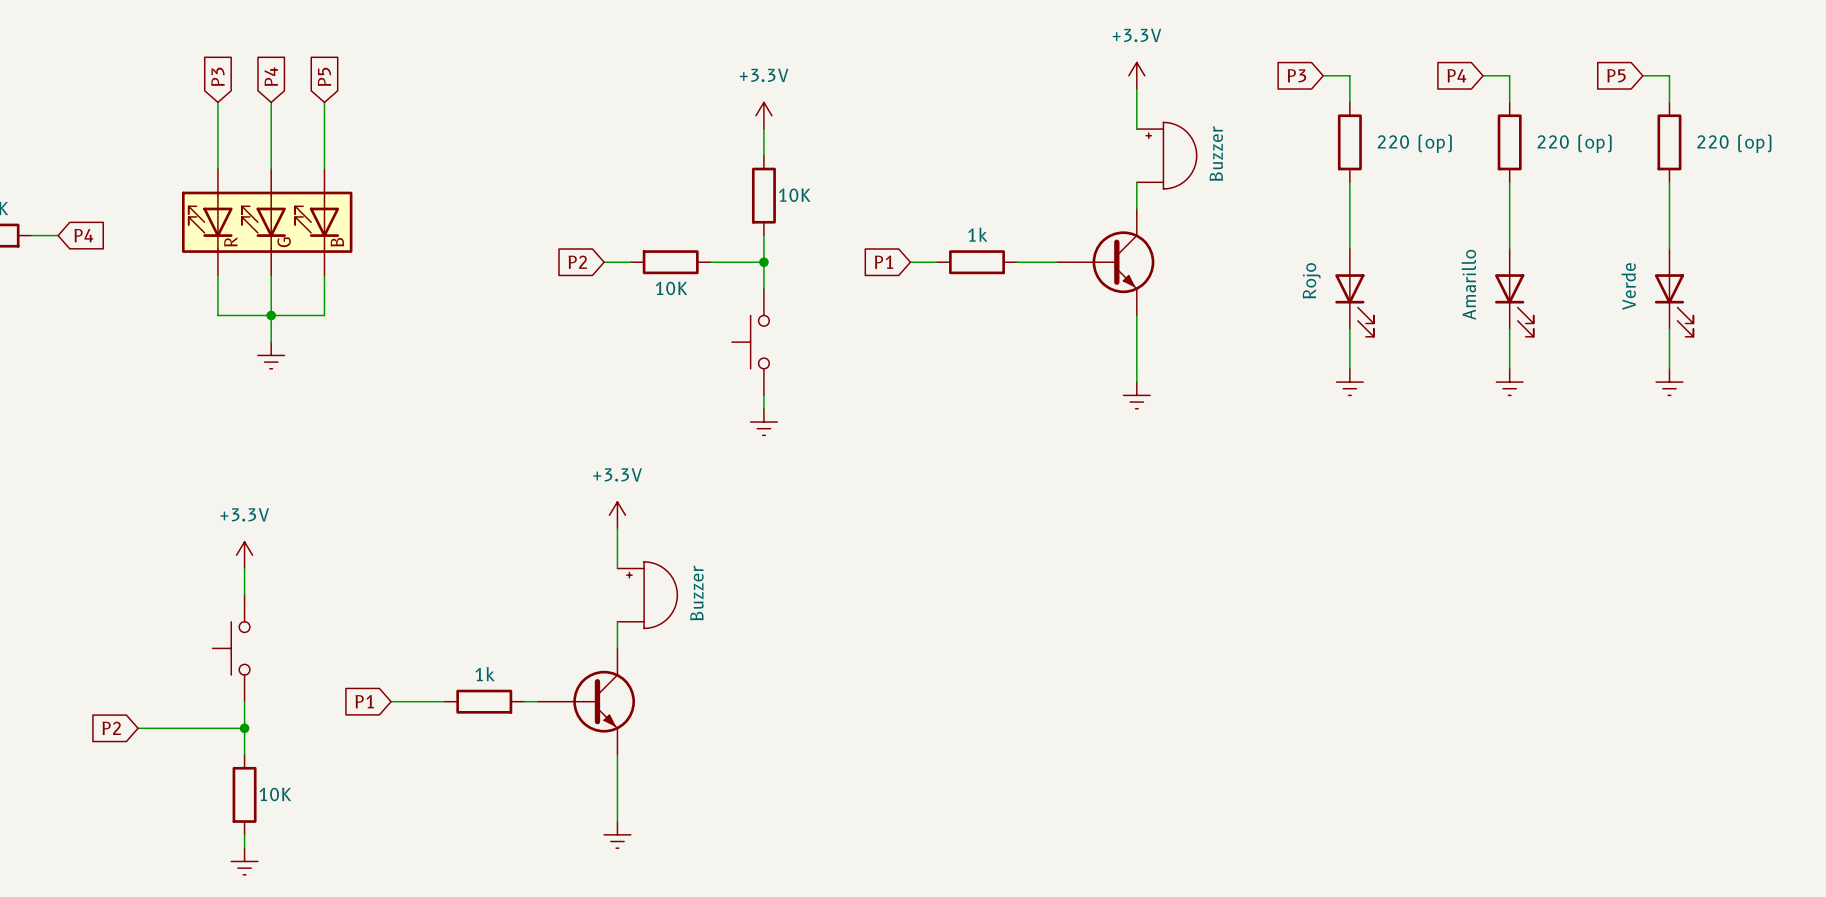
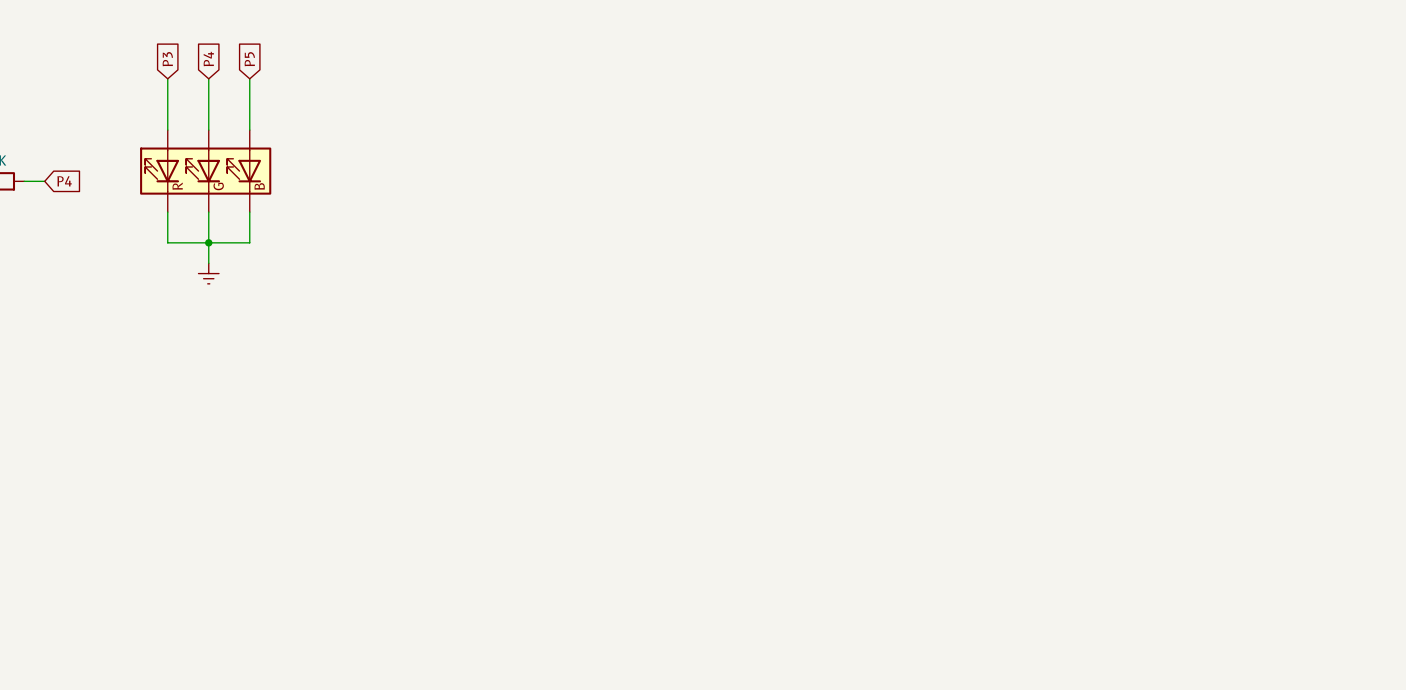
power symbol: +3.3V (1136, 75) -> none
global label: P3 (1296, 75) -> none
wire: (1323, 75) (1349, 75) (1349, 102) -> none
global label: P4 (1456, 75) -> none
wire: (1483, 75) (1509, 75) (1509, 102) -> none
global label: P5 (1616, 75) -> none
wire: (1642, 75) (1669, 75) (1669, 102) -> none
wire: (1136, 89) (1136, 129) -> none
power symbol: +3.3V (763, 115) -> none
wire: (763, 129) (763, 155) -> none
part: 220 (op) (1349, 142) -> none
part: 220 (op) (1509, 142) -> none
part: 220 (op) (1669, 142) -> none
part: Buzzer (1166, 155) -> none
wire: (1136, 182) (1136, 208) -> none
wire: (1349, 182) (1349, 248) -> none
wire: (1509, 182) (1509, 248) -> none
wire: (1669, 182) (1669, 248) -> none
part: 10K (763, 195) -> none
wire: (763, 235) (763, 288) -> none
global label: P2 (577, 262) -> none
wire: (604, 262) (630, 262) -> none
part: 10K (670, 262) -> none
wire: (710, 262) (763, 262) -> none
junction: (763, 262) -> none
global label: P1 (884, 262) -> none
wire: (910, 262) (937, 262) -> none
part: 1k (977, 262) -> none
wire: (1016, 262) (1056, 262) -> none
part: (1105, 262) -> none
part: Rojo (1354, 292) -> none
part: Amarillo (1514, 292) -> none
part: Verde (1674, 292) -> none
wire: (1136, 315) (1136, 382) -> none
wire: (1349, 328) (1349, 368) -> none
wire: (1509, 328) (1509, 368) -> none
wire: (1669, 328) (1669, 368) -> none
part: (750, 342) -> none
power symbol: (1349, 382) -> none
power symbol: (1509, 382) -> none
power symbol: (1669, 382) -> none
wire: (763, 395) (763, 408) -> none
power symbol: (1136, 395) -> none
power symbol: (763, 422) -> none
power symbol: +3.3V (617, 515) -> none
wire: (617, 528) (617, 568) -> none
power symbol: +3.3V (244, 555) -> none
wire: (244, 568) (244, 595) -> none
part: Buzzer (647, 595) -> none
wire: (617, 621) (617, 648) -> none
part: (231, 648) -> none
wire: (244, 701) (244, 754) -> none
global label: P1 (364, 701) -> none
wire: (391, 701) (444, 701) -> none
part: 1k (484, 701) -> none
wire: (524, 701) (537, 701) -> none
part: (586, 701) -> none
global label: P2 (111, 728) -> none
wire: (138, 728) (244, 728) -> none
junction: (244, 728) -> none
wire: (617, 754) (617, 821) -> none
part: 10K (244, 794) -> none
wire: (244, 834) (244, 848) -> none
power symbol: (617, 834) -> none
power symbol: (244, 861) -> none

